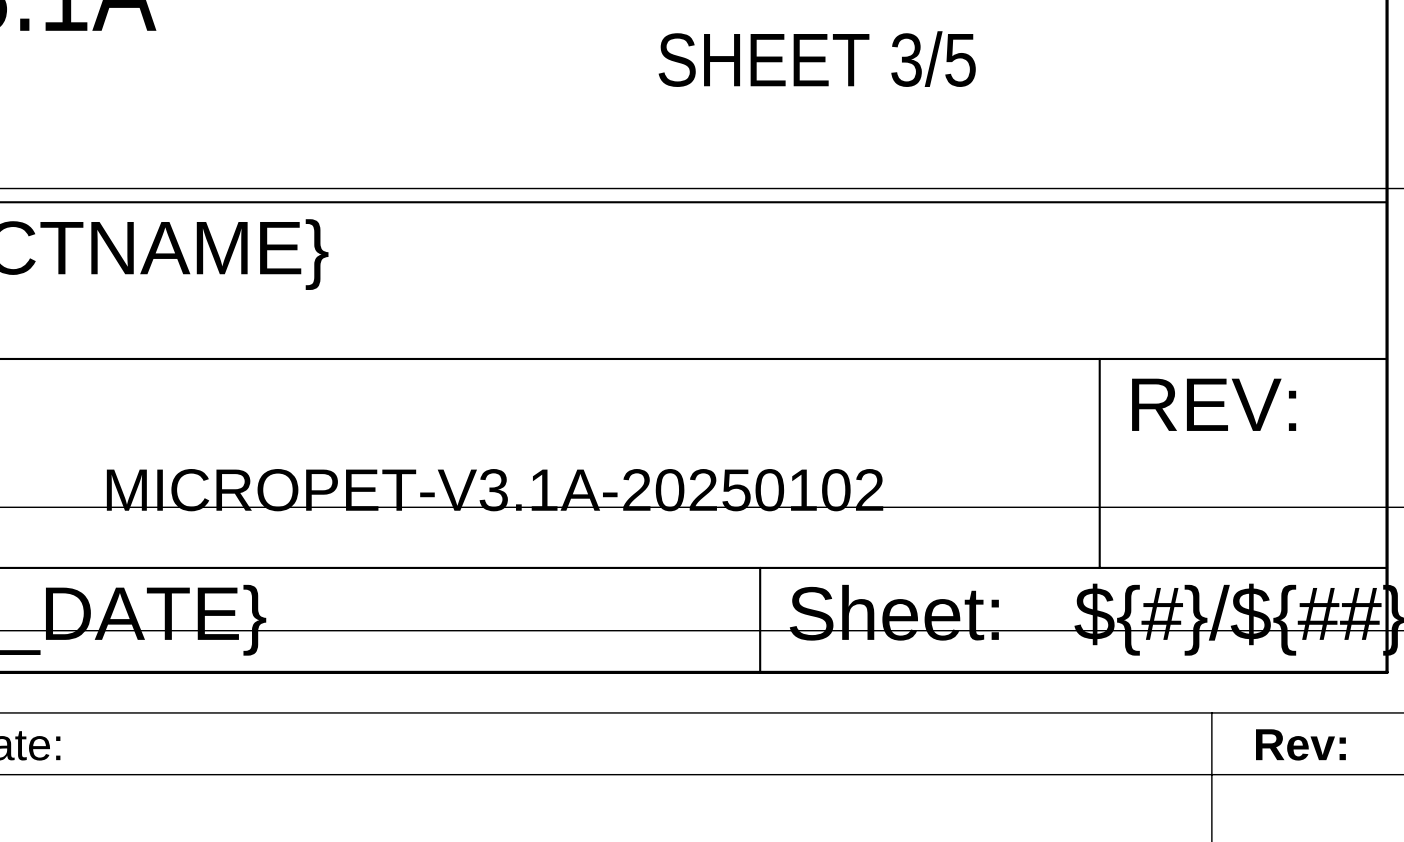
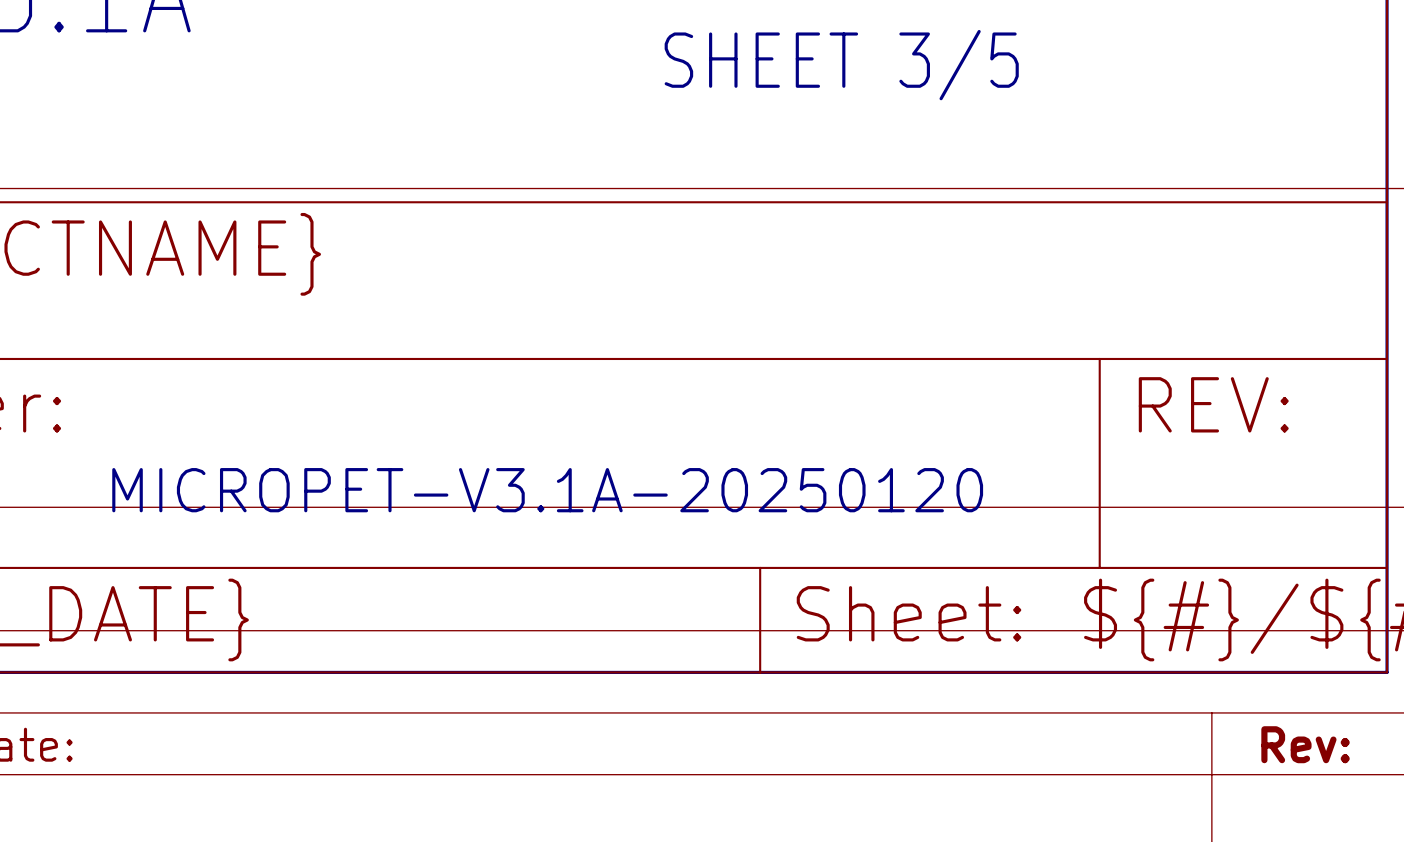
text: MICROPET-V3.1A-20250102 (495, 490) -> MICROPET-V3.1A-20250120 (547, 490)

